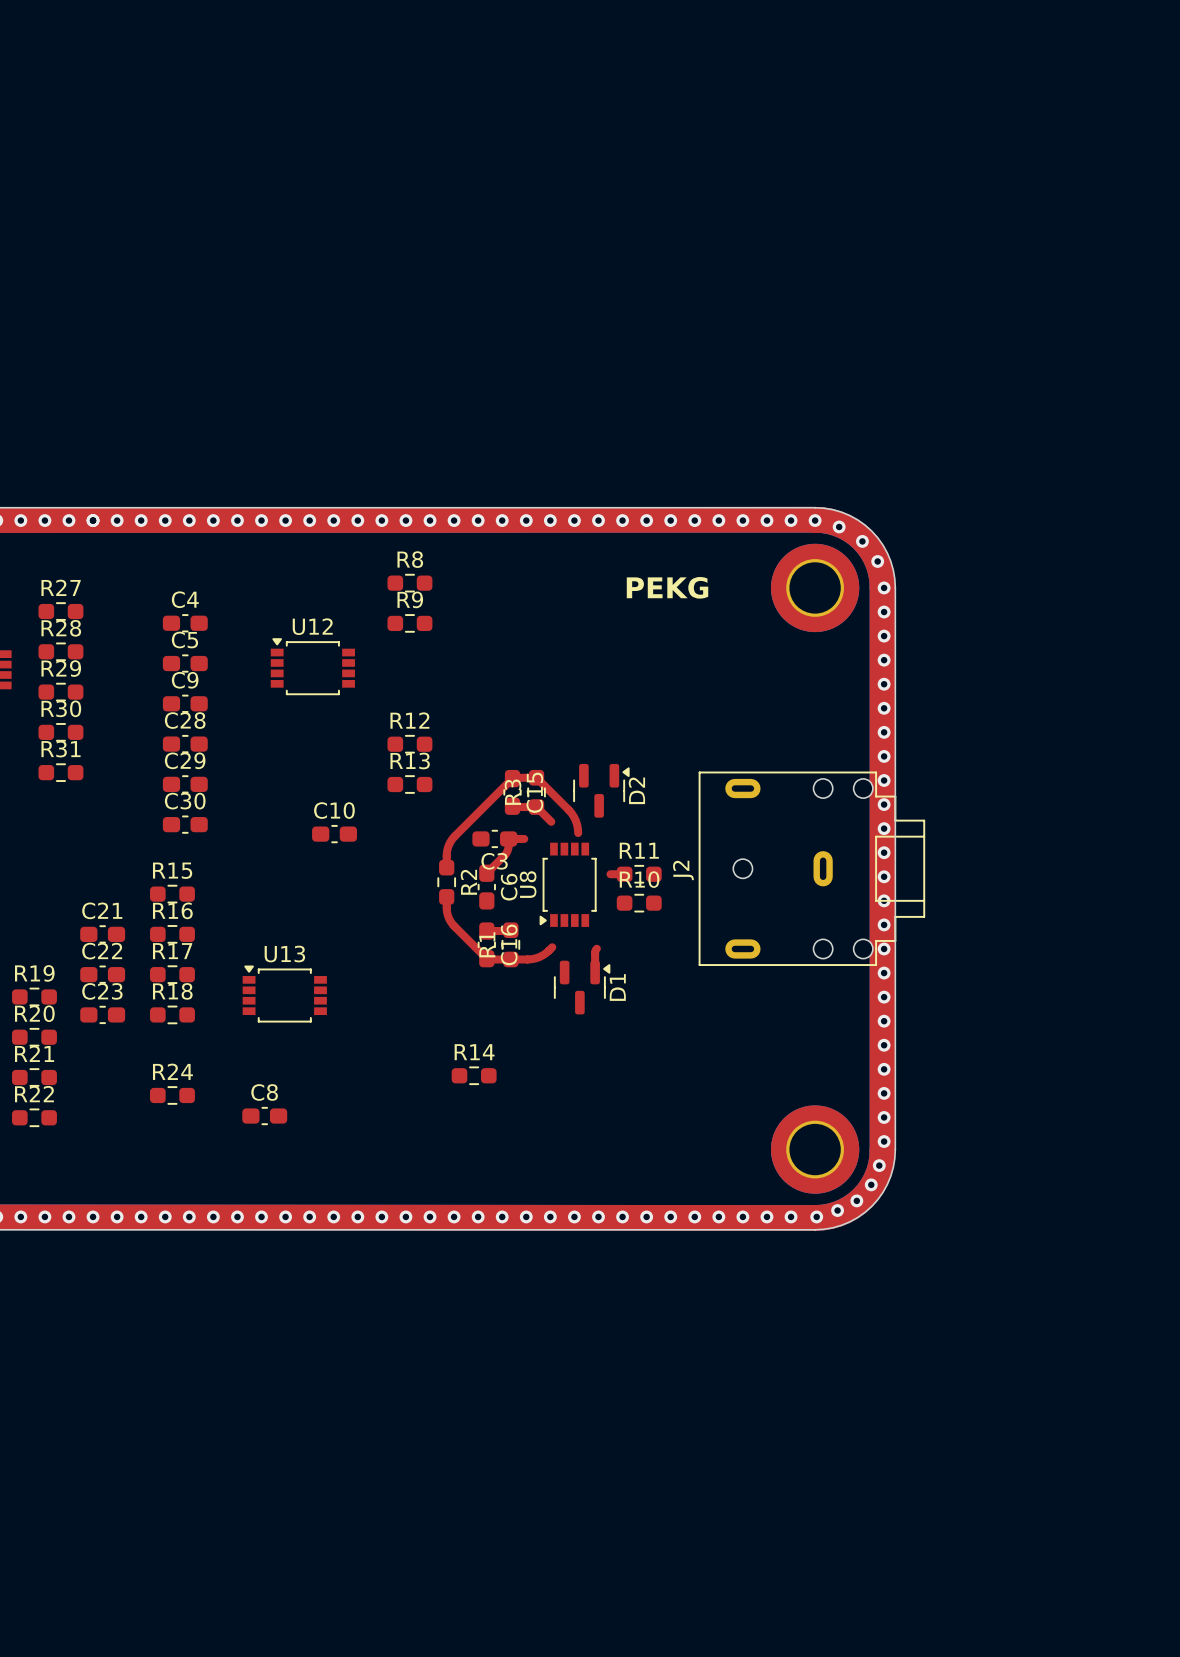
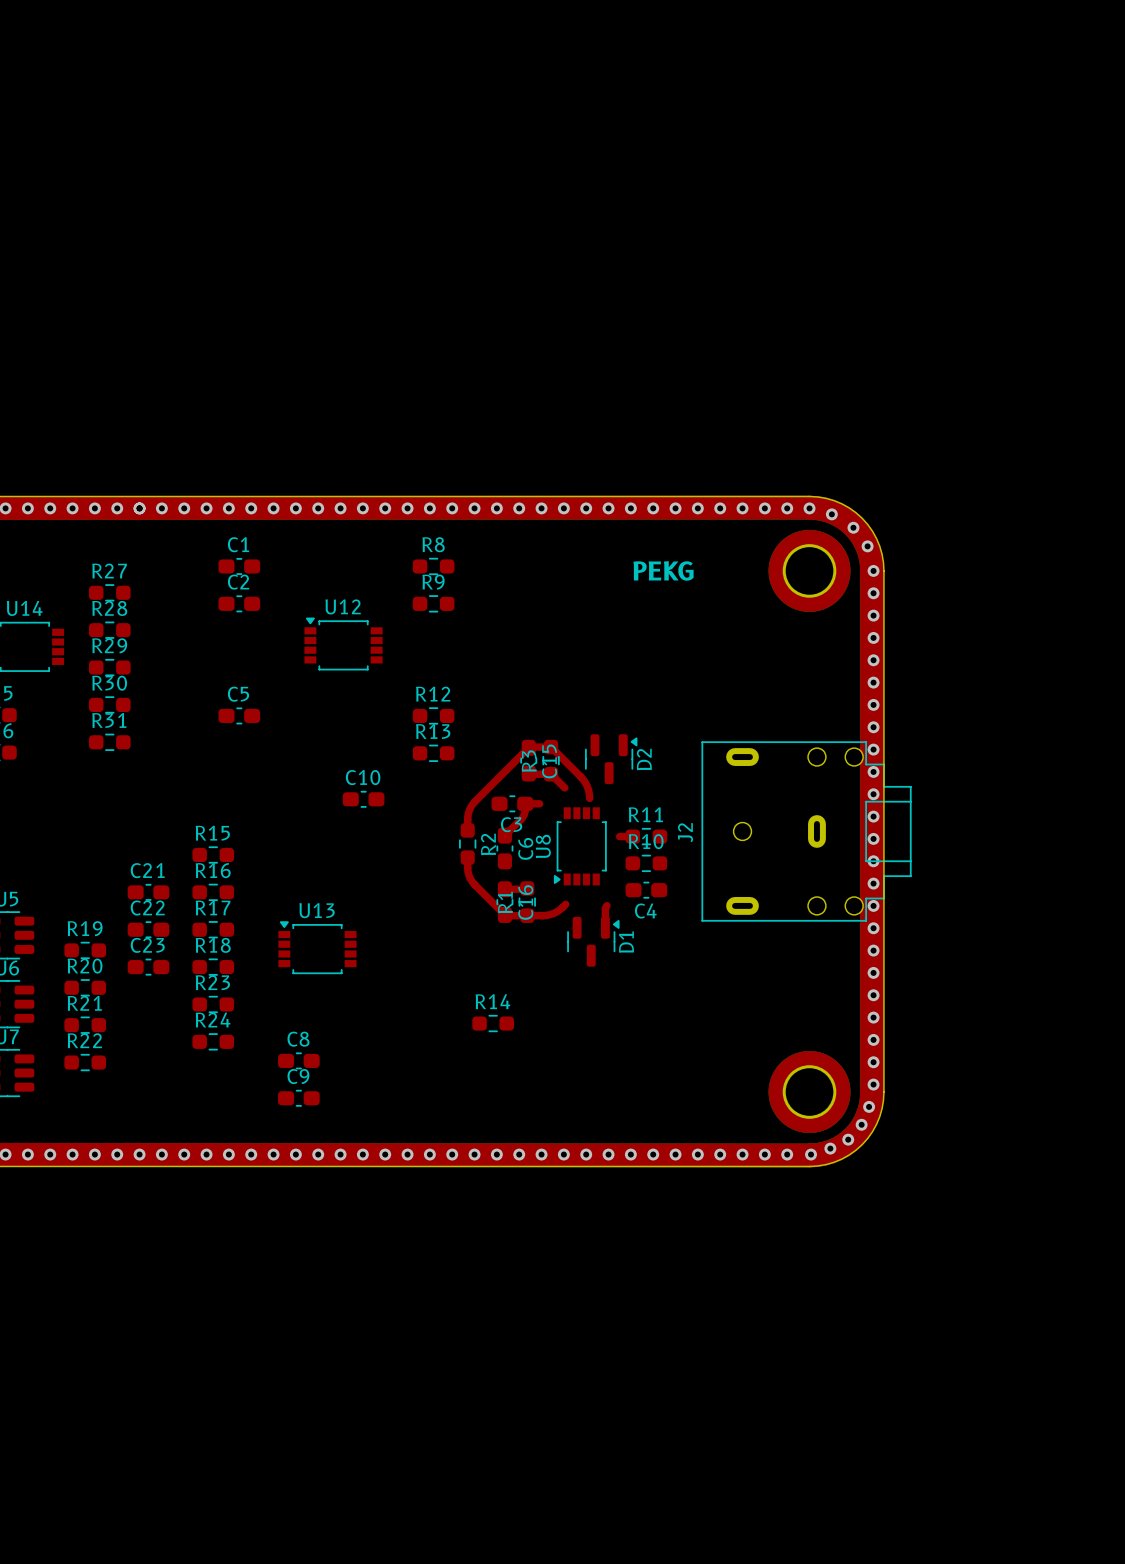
C1: none -> (239, 566)
C4 name position: C4 (185, 599) -> C4 (645, 910)
C4 position: (185, 623) -> (646, 890)
C2: none -> (239, 603)
C5 position: (185, 663) -> (239, 715)
C9 position: (185, 703) -> (298, 1098)
C28: (185, 744) -> none
C29: (185, 784) -> none
C30: (185, 824) -> none
R23: none -> (213, 1004)

